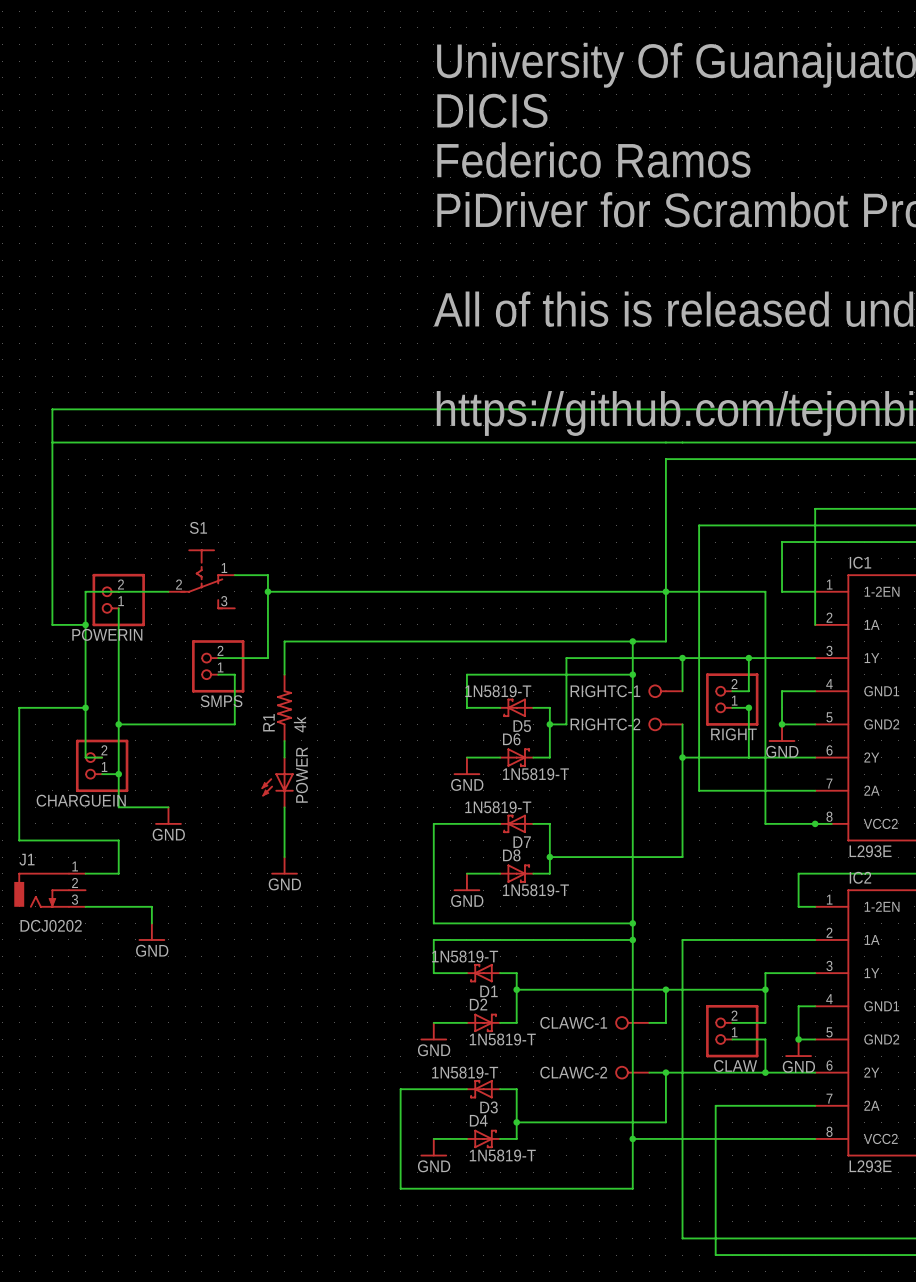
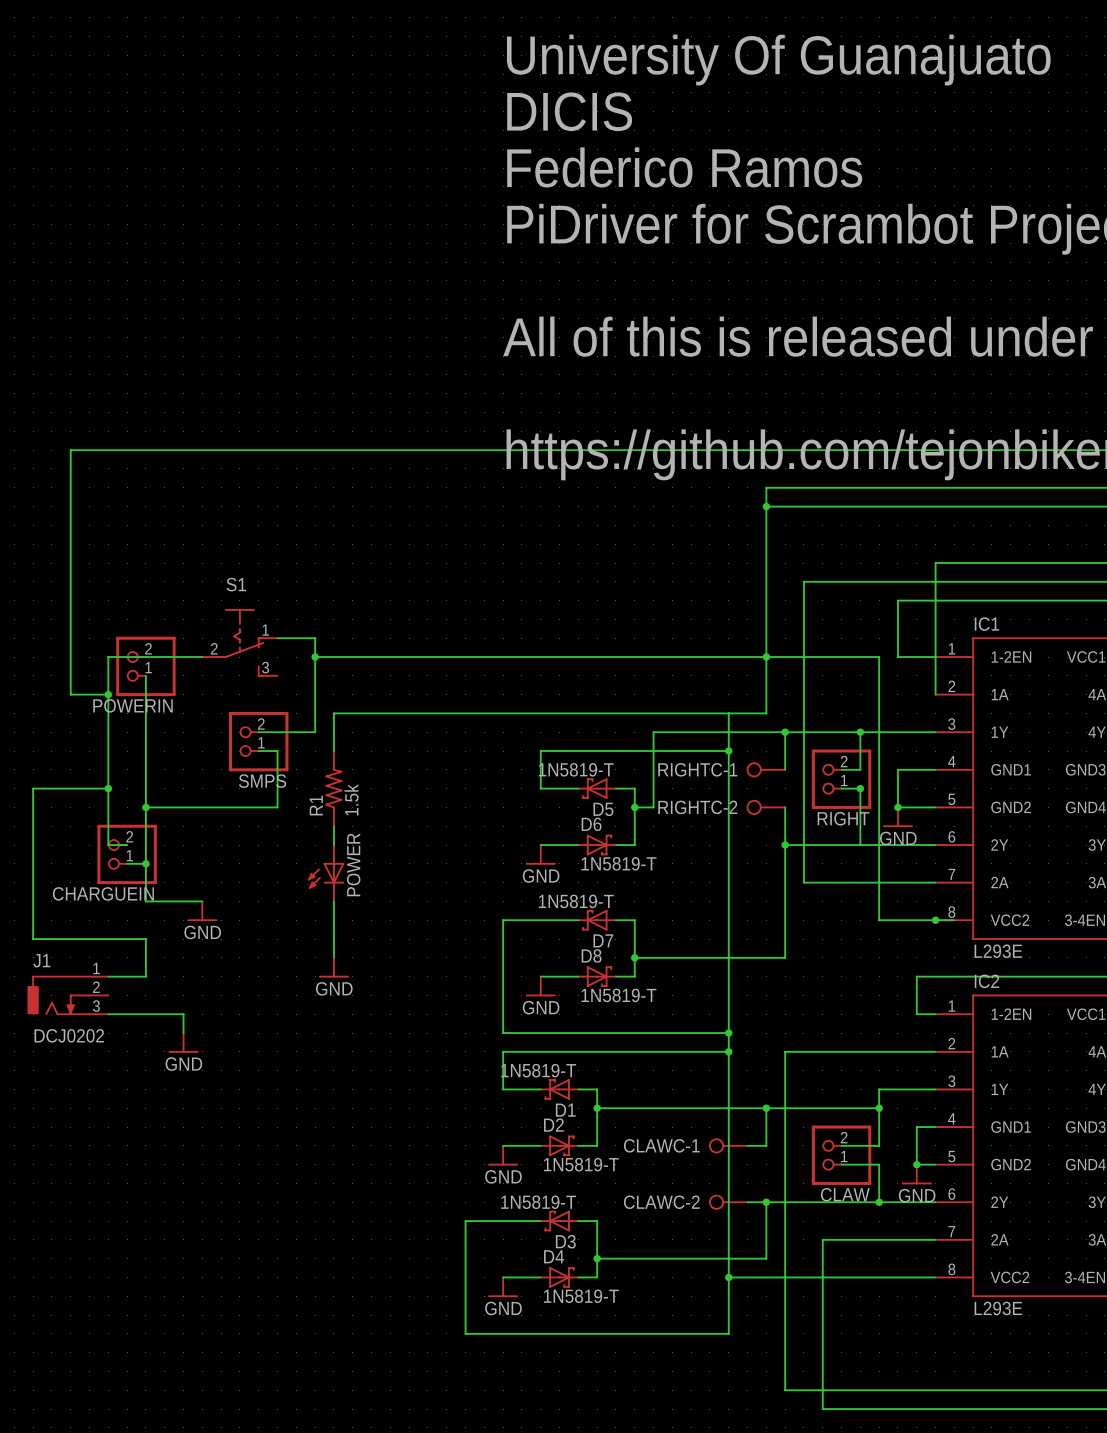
wire: (52, 442) (665, 442) -> (766, 506) (766, 487)
junction: none -> (766, 506)
junction: (632, 641) -> none
R1 value: 4k (299, 724) -> 1.5k (351, 799)

